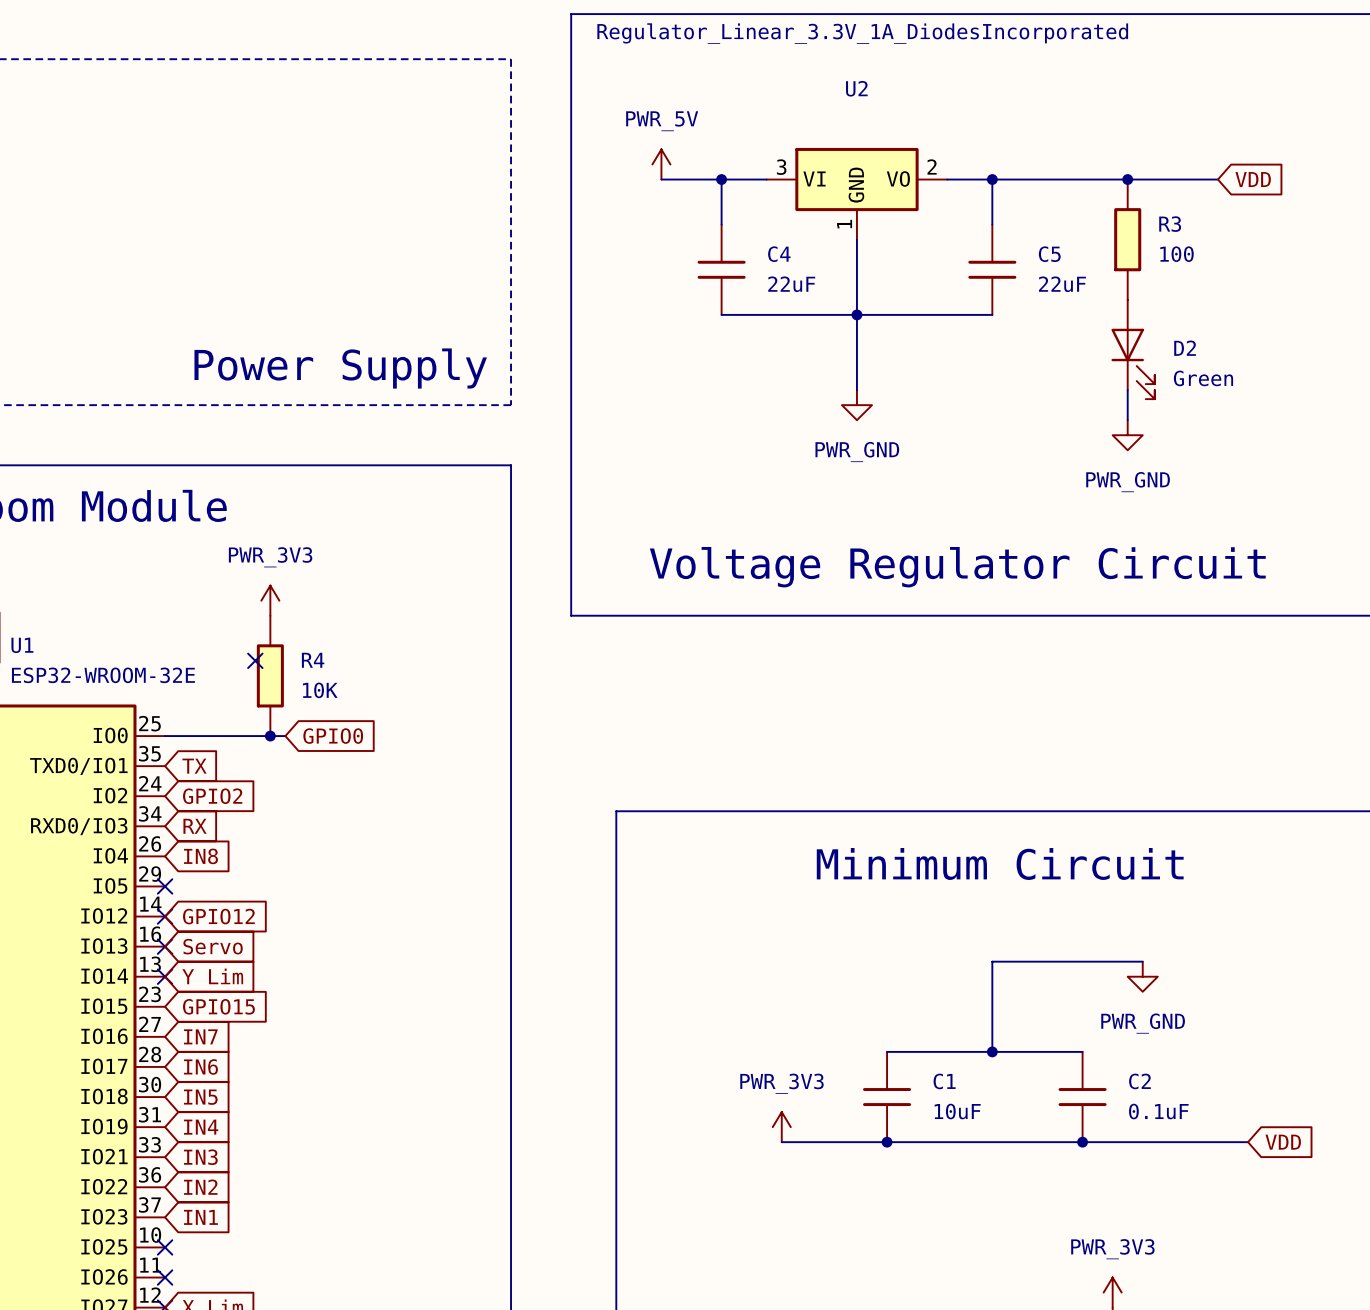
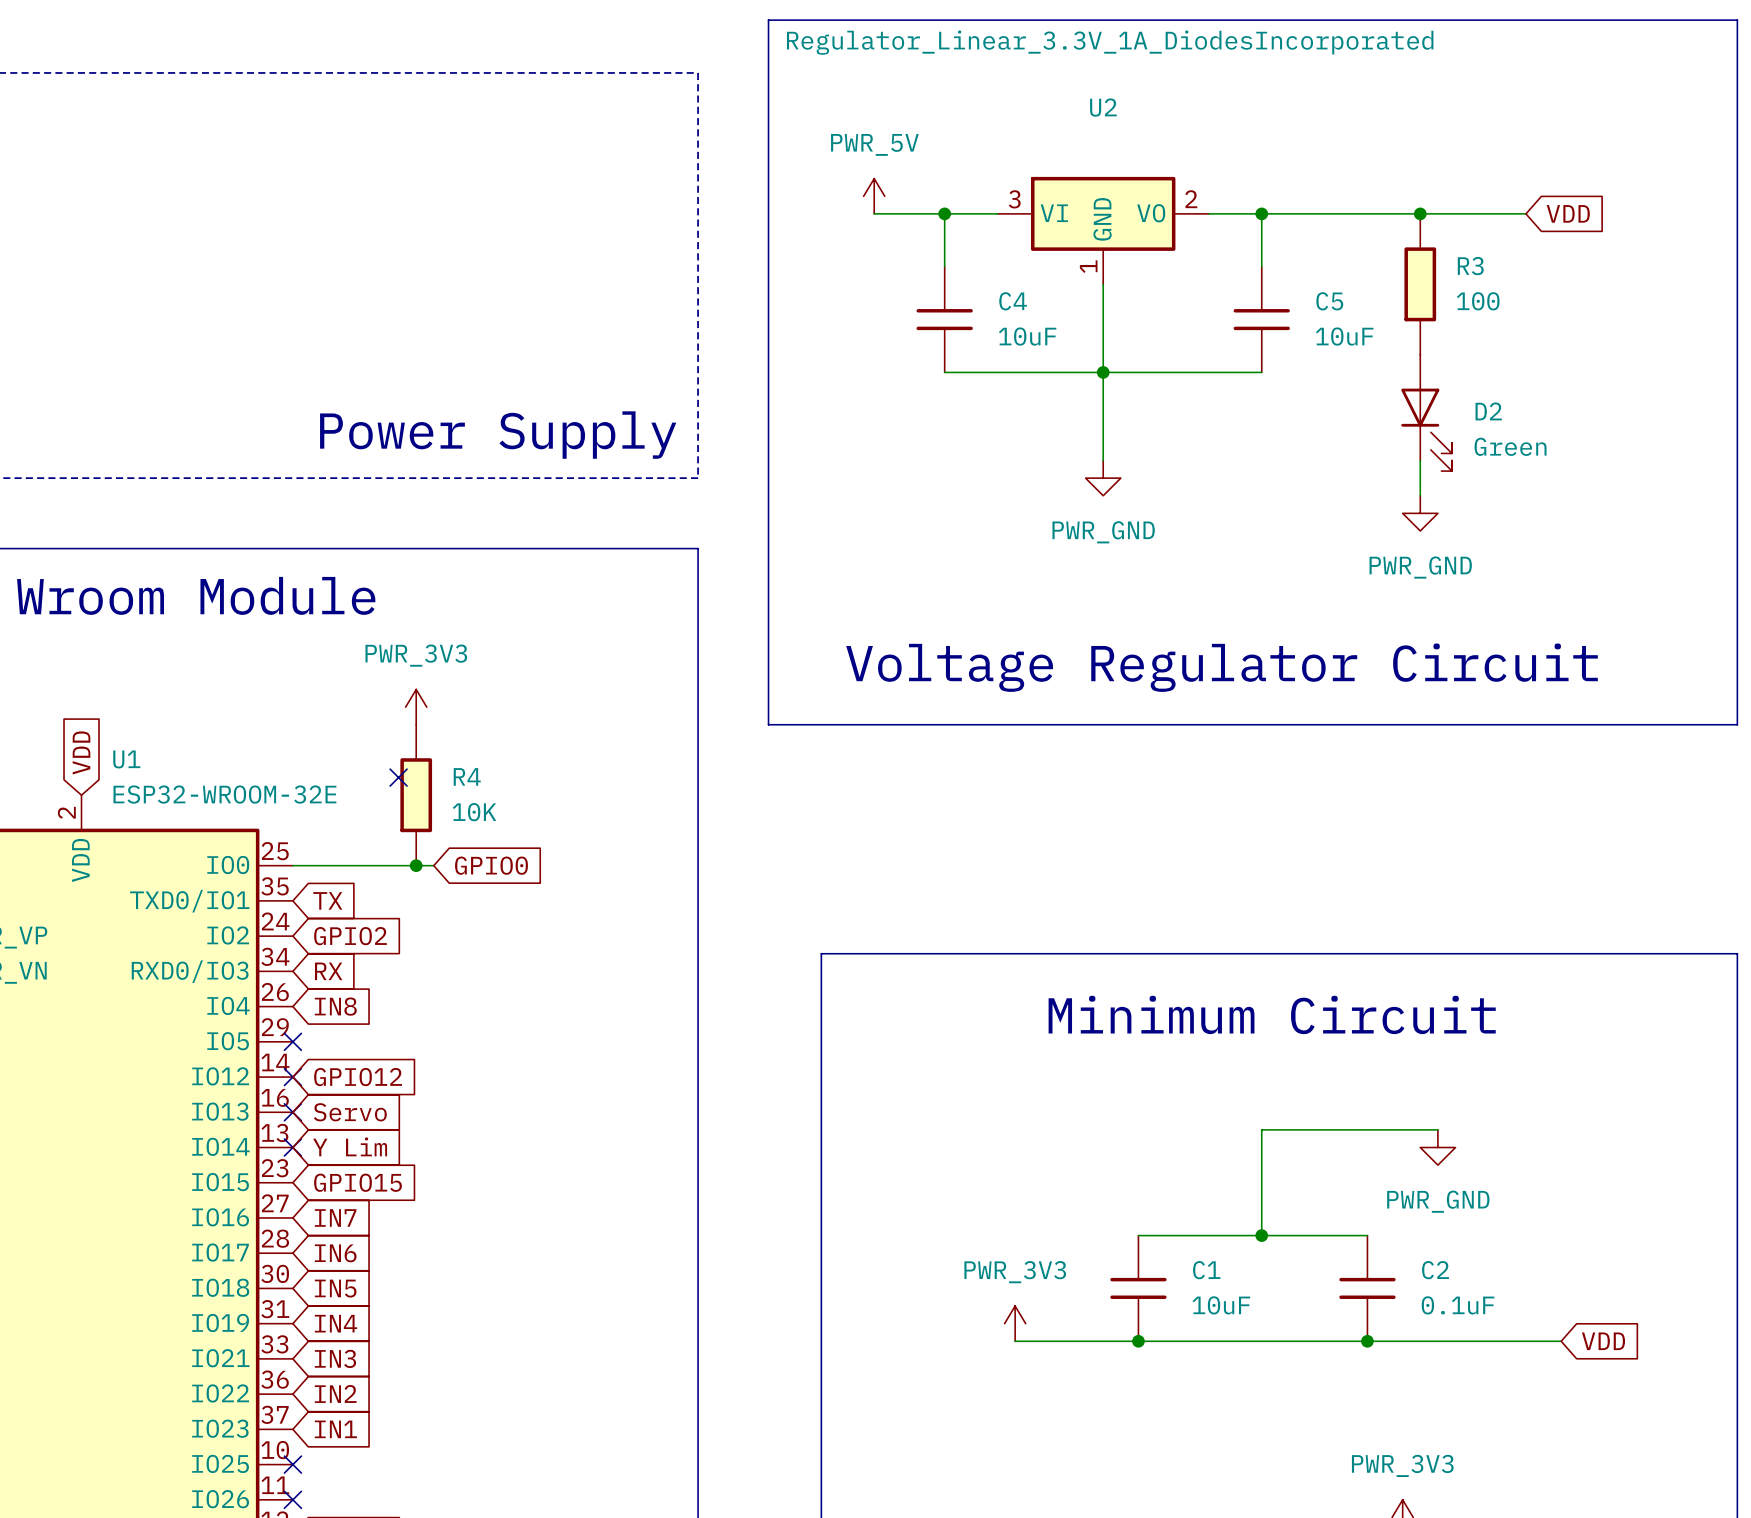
C4 value: 22uF (791, 284) -> 10uF (1027, 336)
C5 value: 22uF (1062, 284) -> 10uF (1344, 336)

